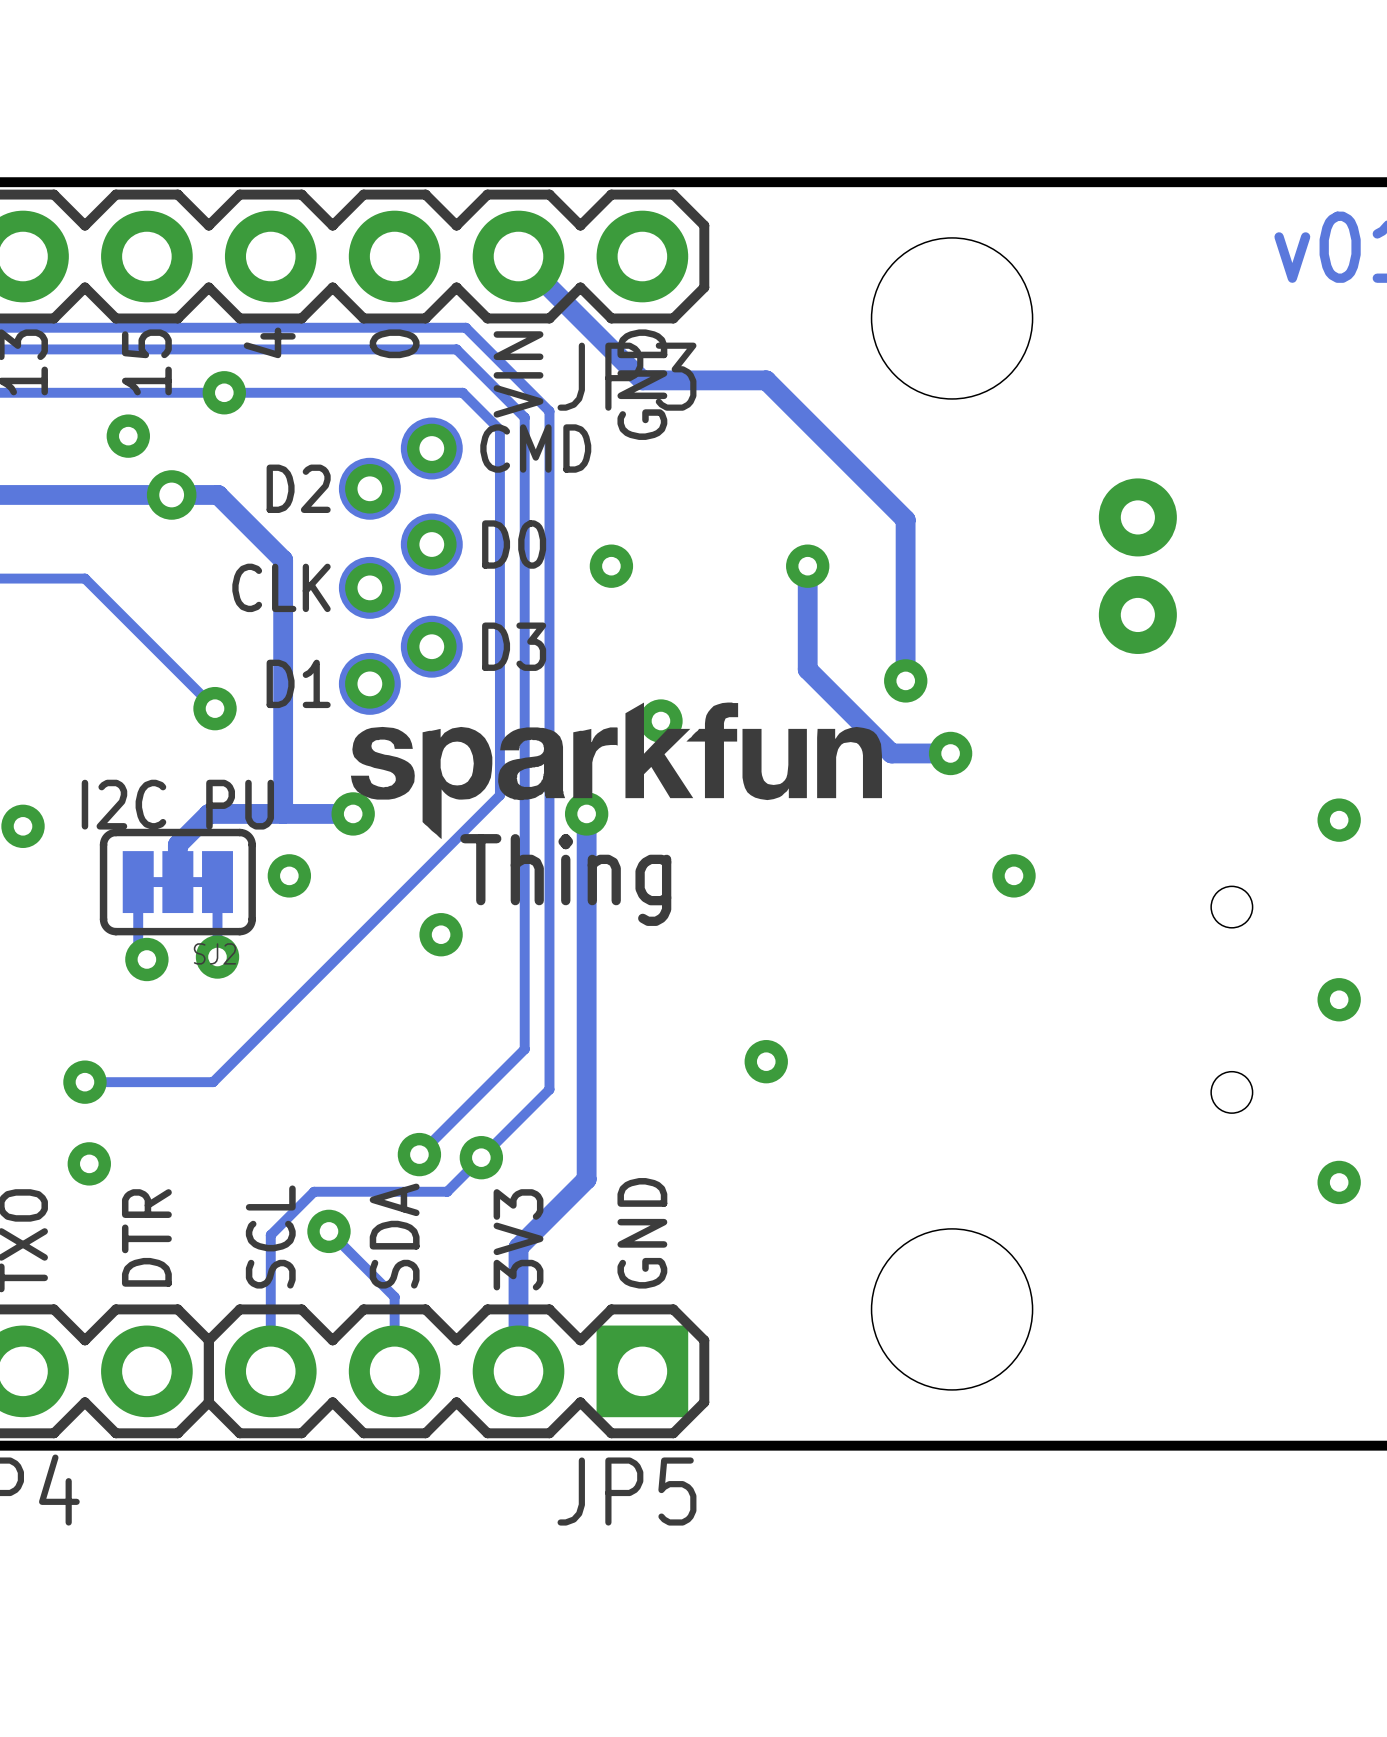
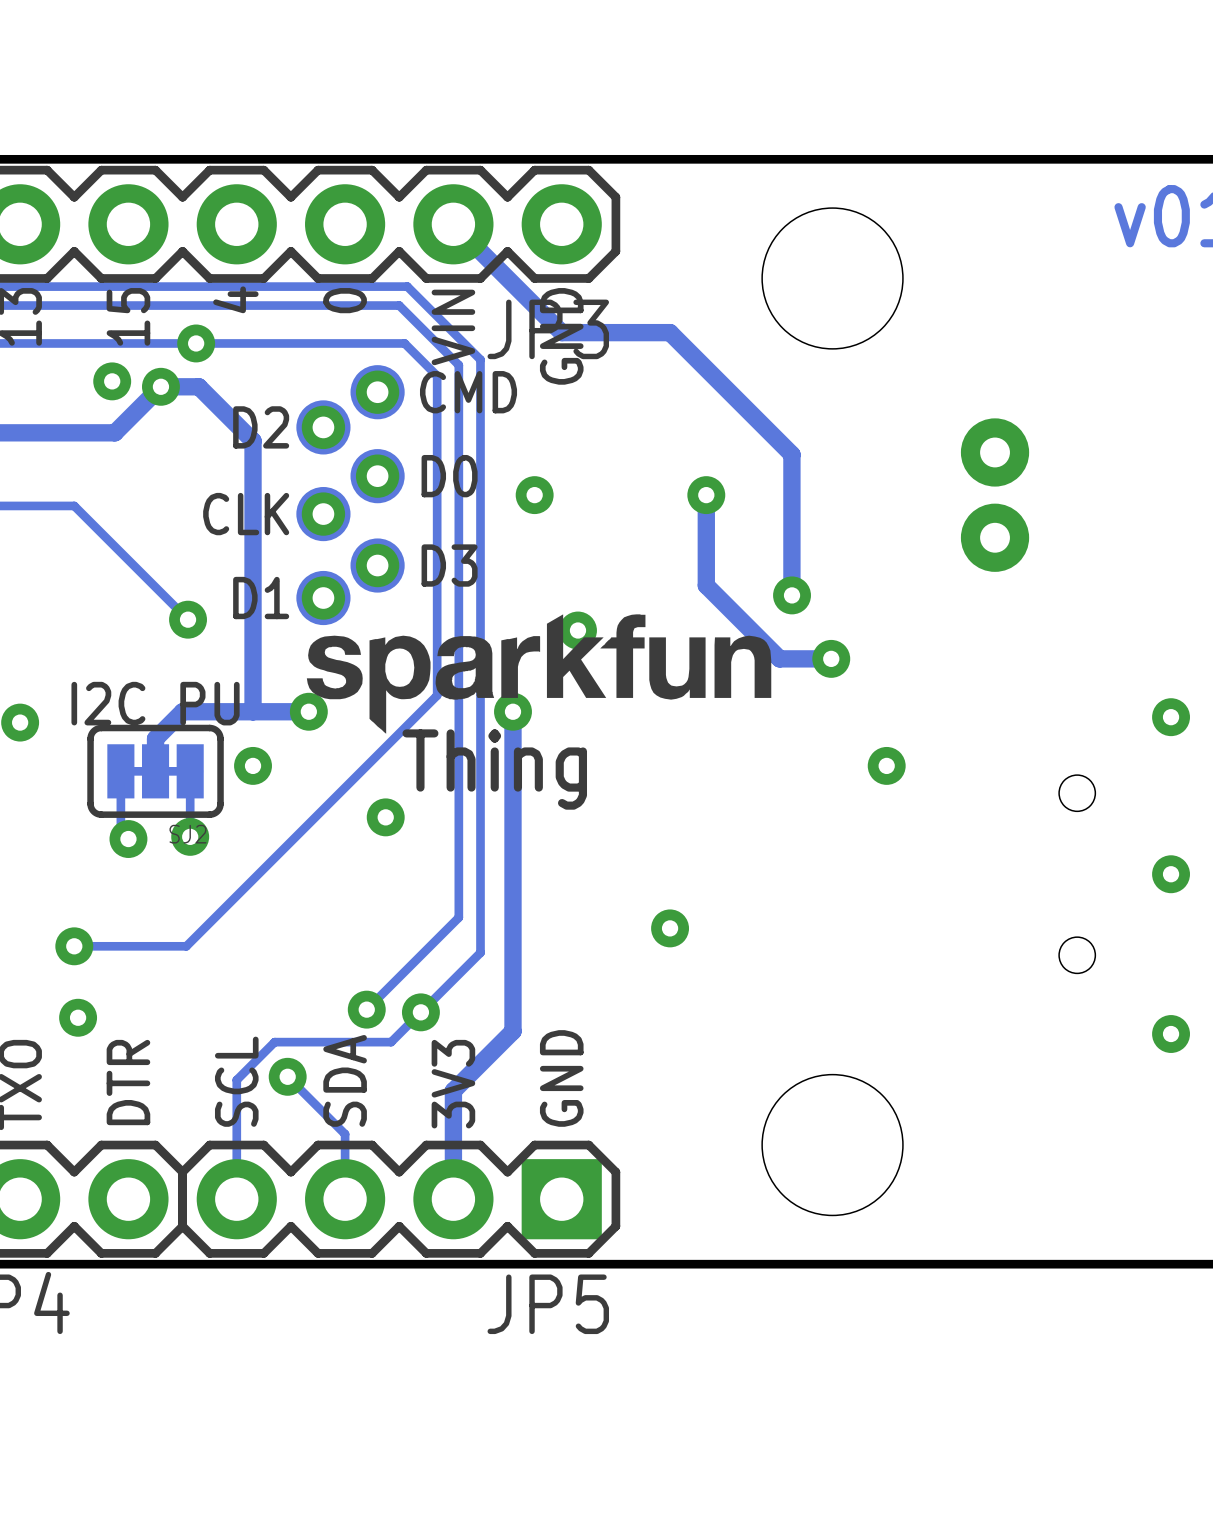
via: none -> (160, 386)
track: (131, 494) (218, 494) (283, 560) (283, 813) -> (114, 432) (160, 386) (198, 386) (253, 440) (253, 711)
via: (171, 494) -> none

